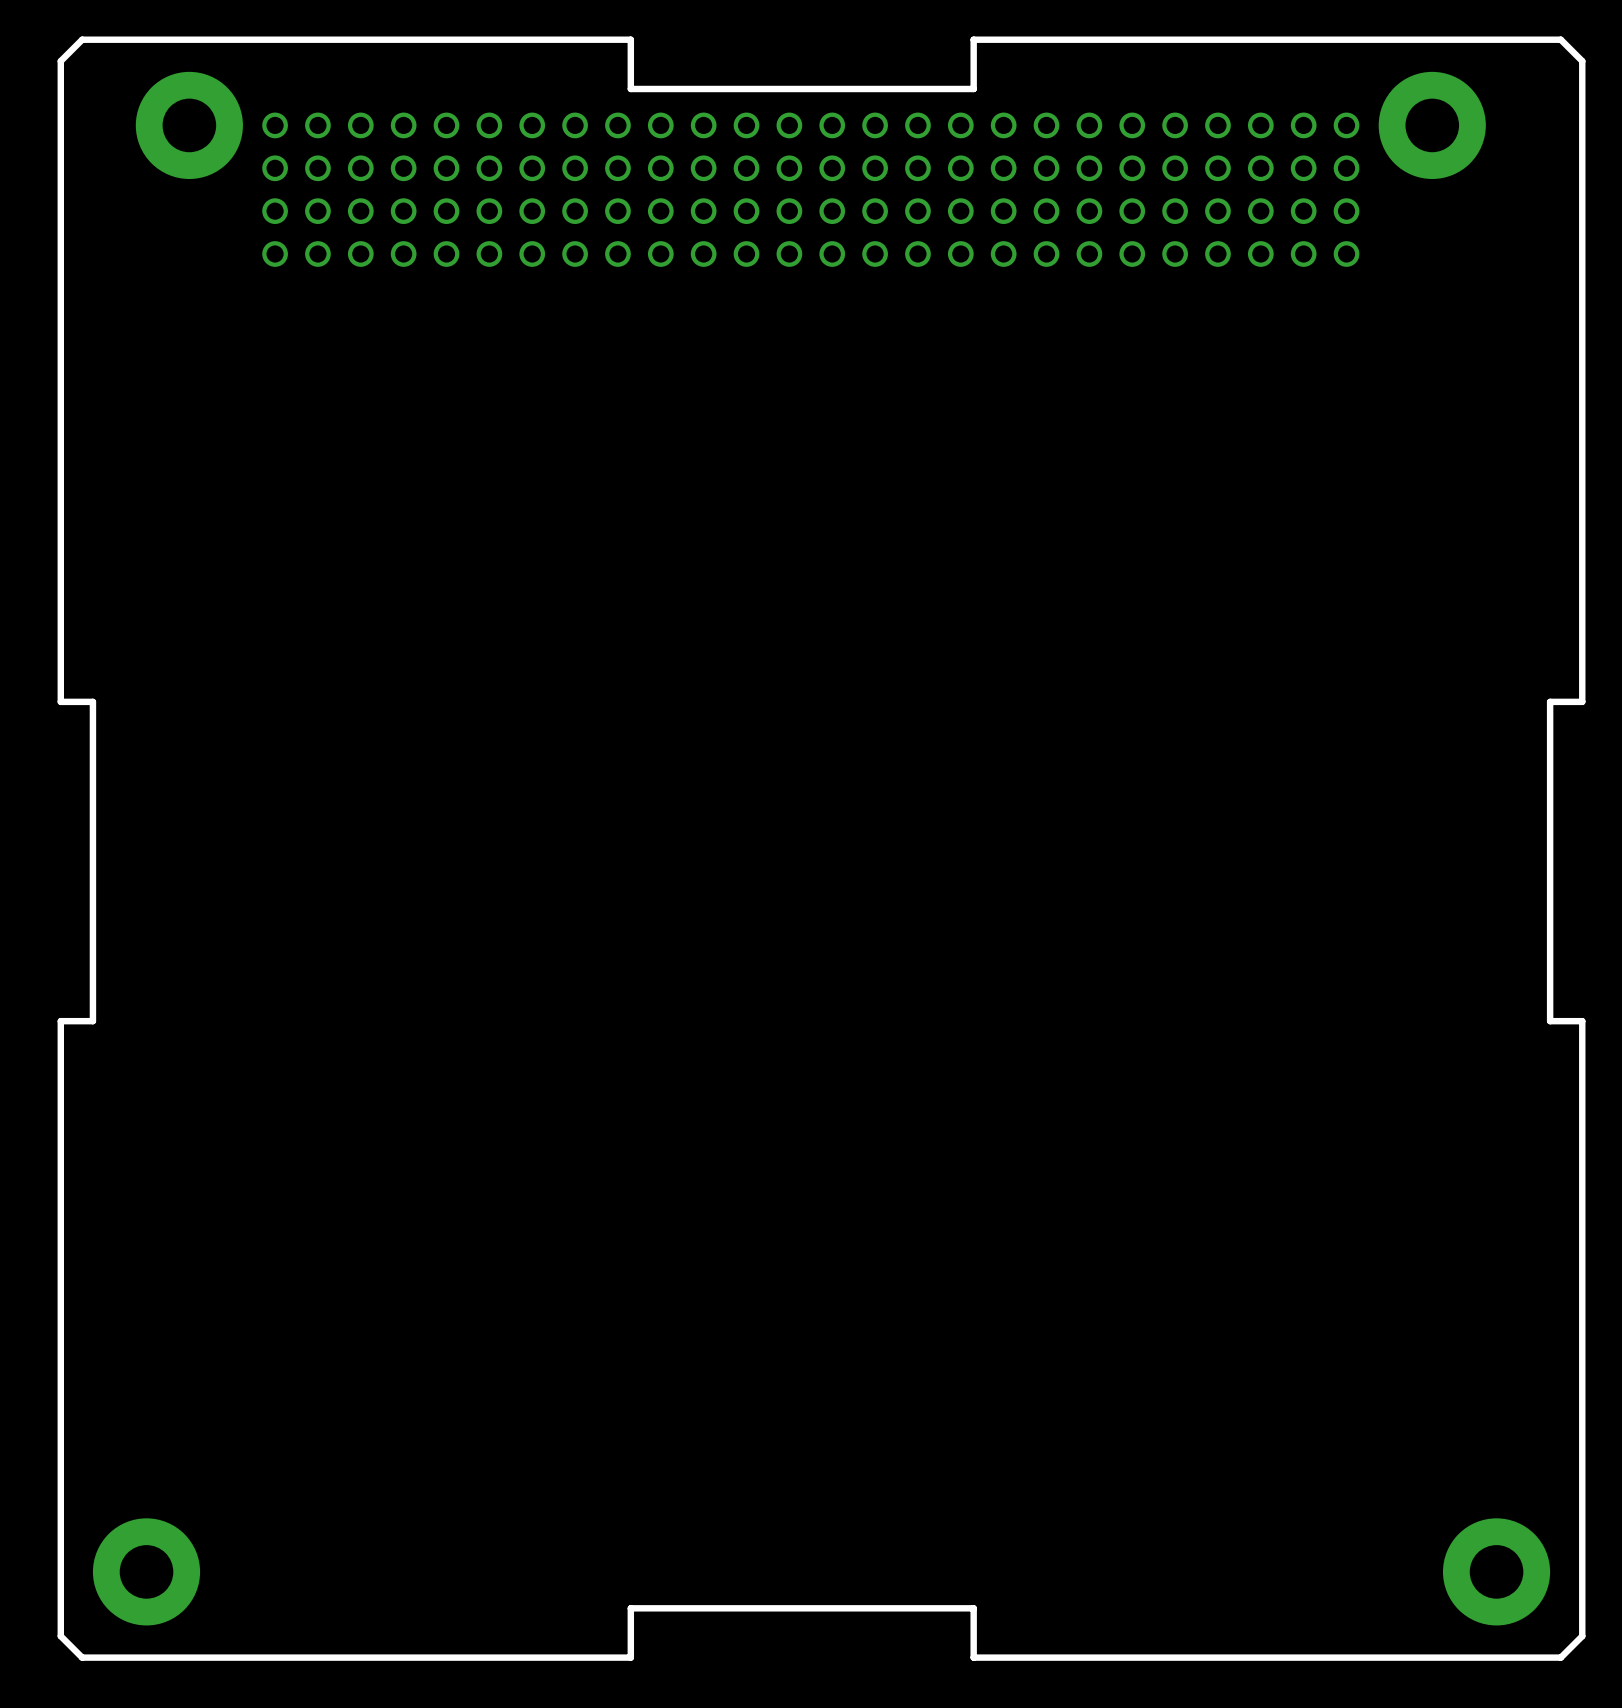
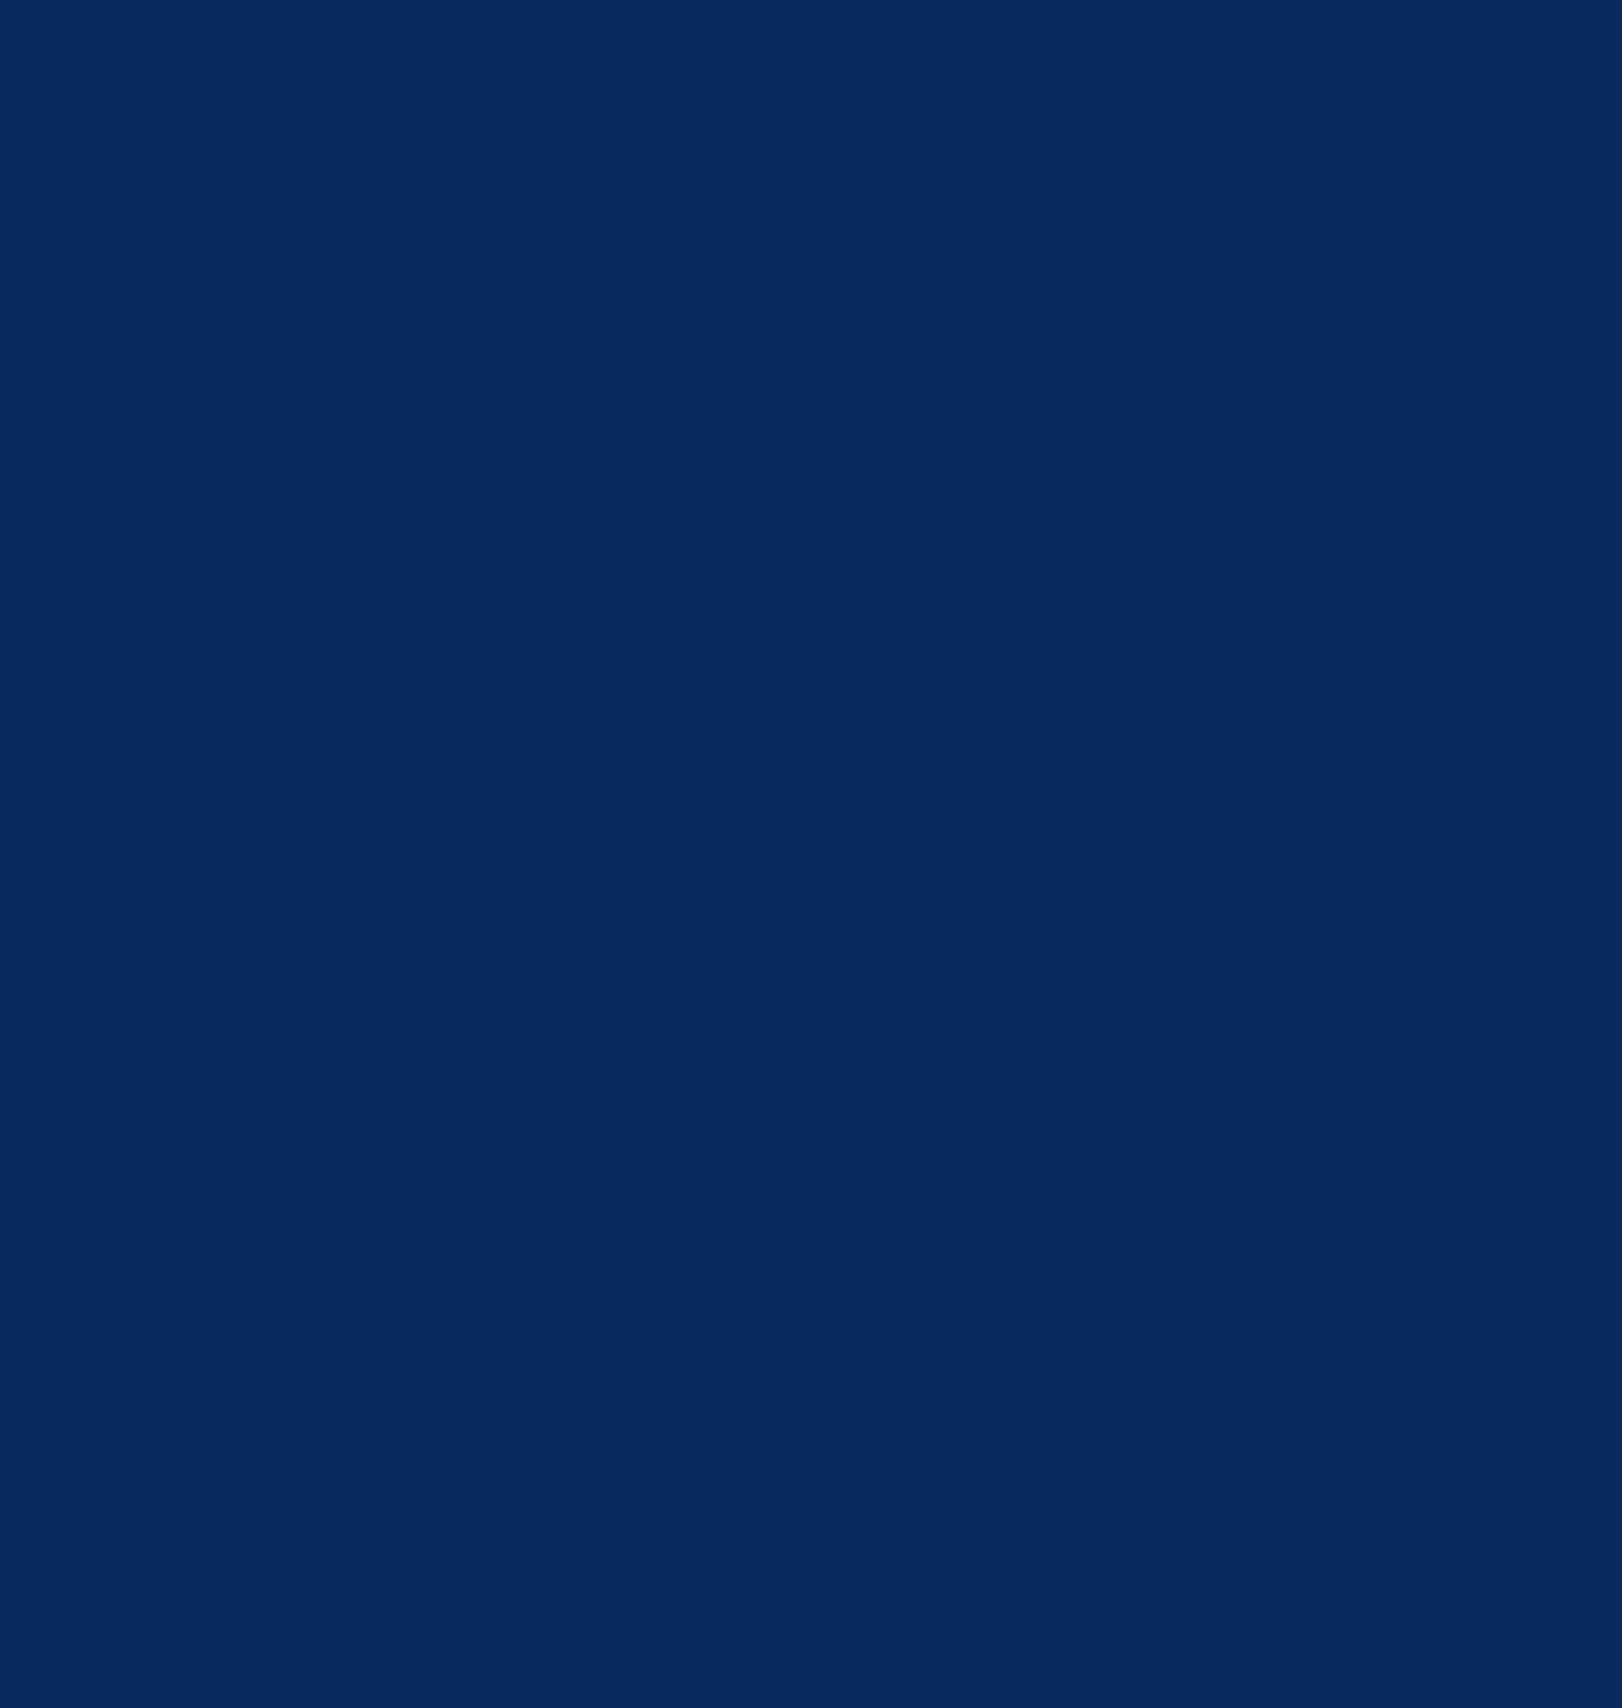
part: (821, 848) -> none

